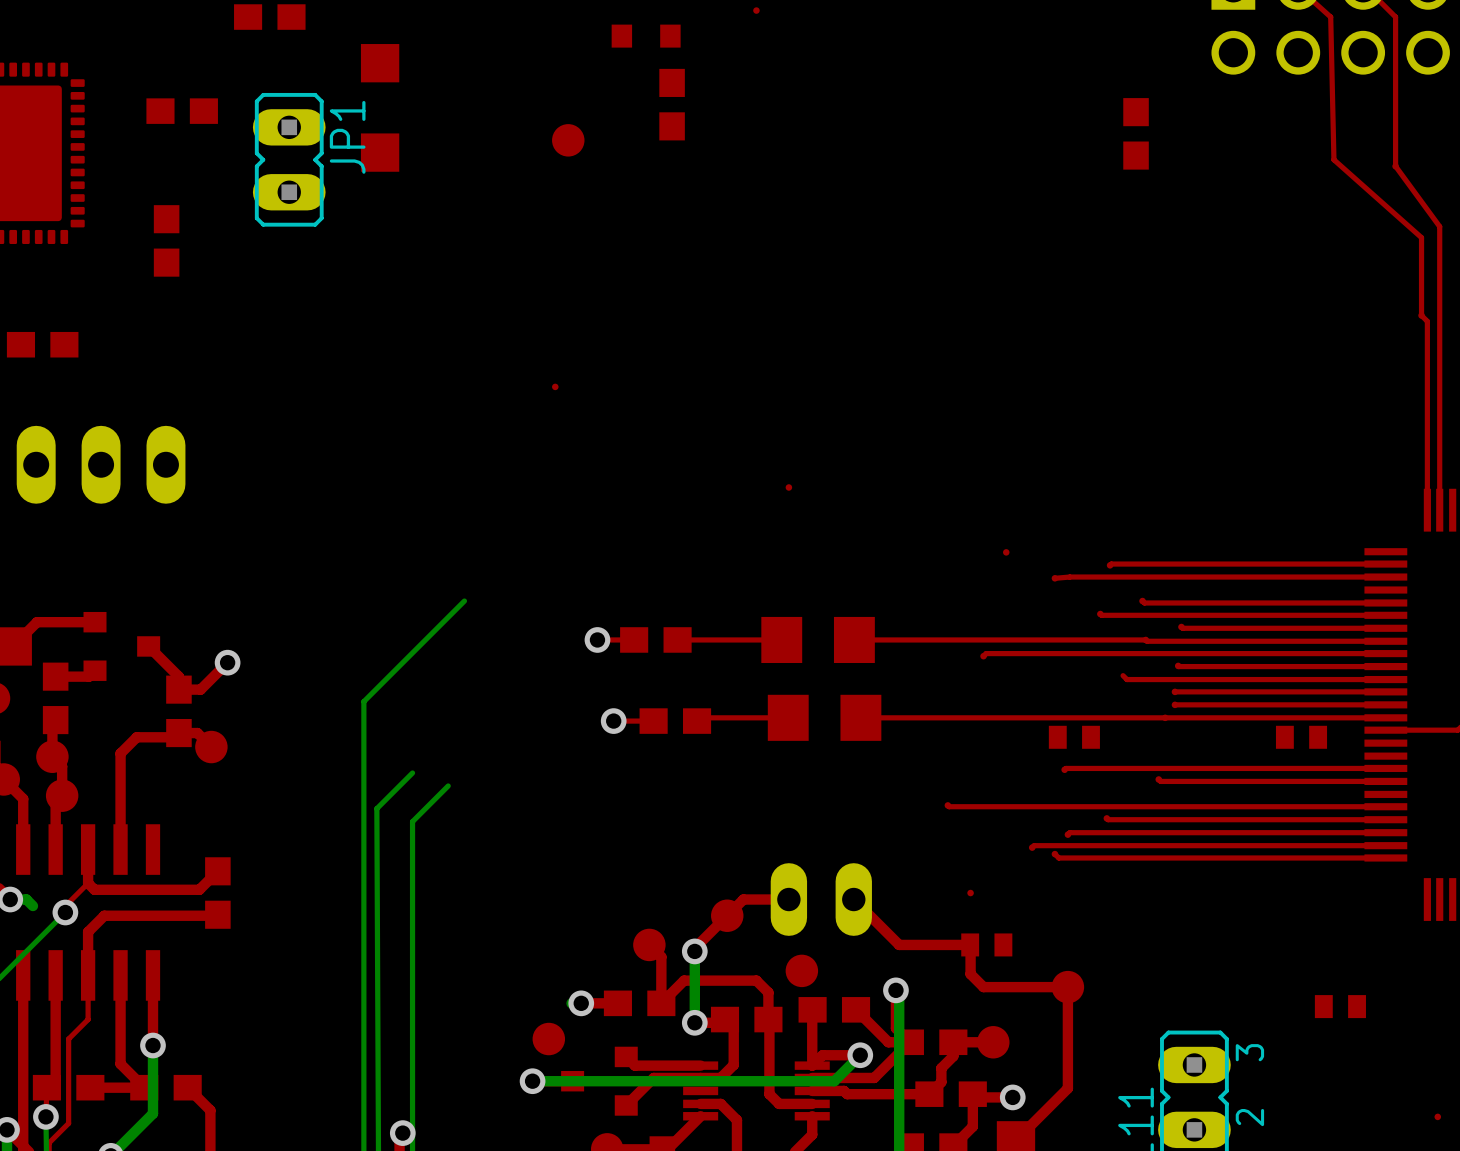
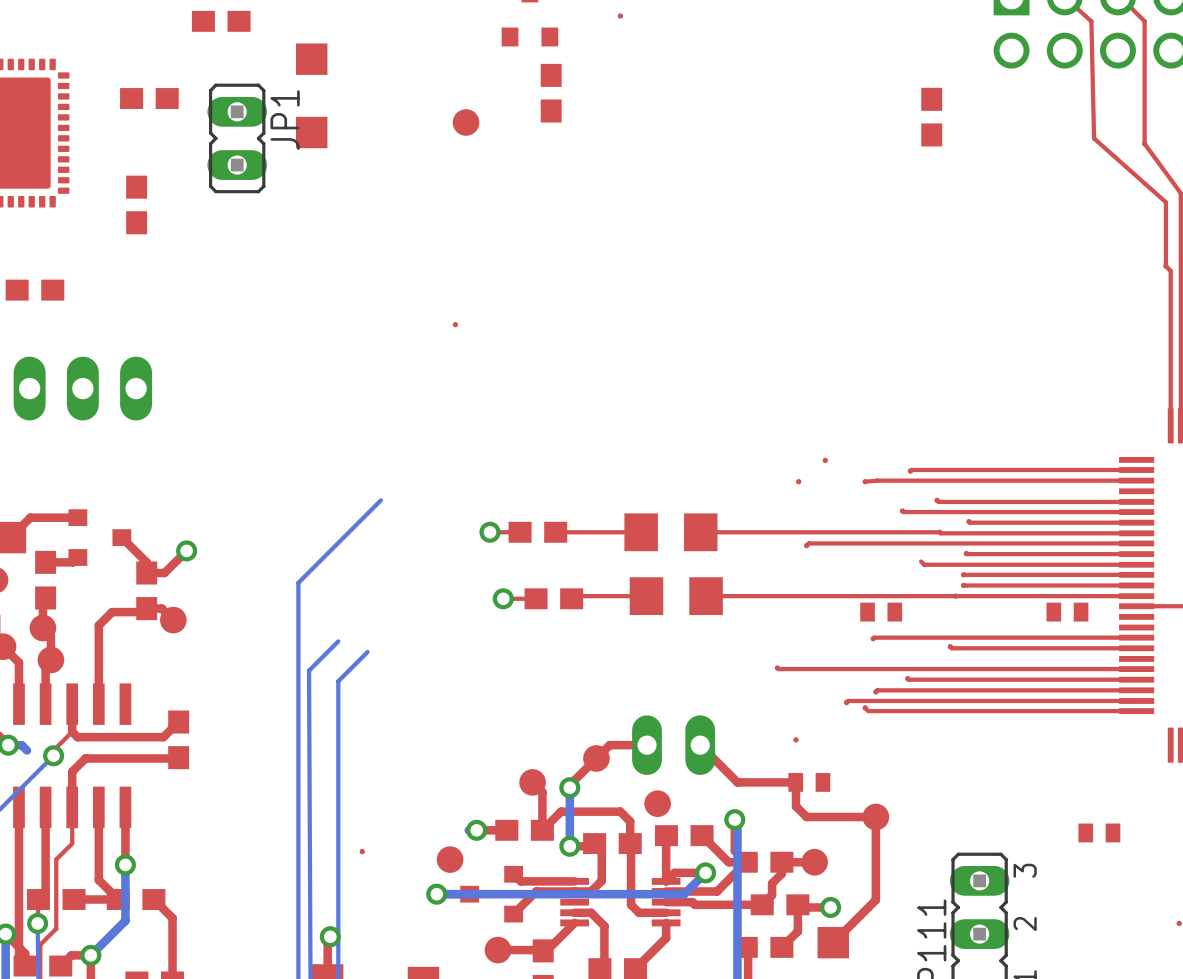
part position: (788, 487) -> (798, 481)
part: none -> (362, 851)

